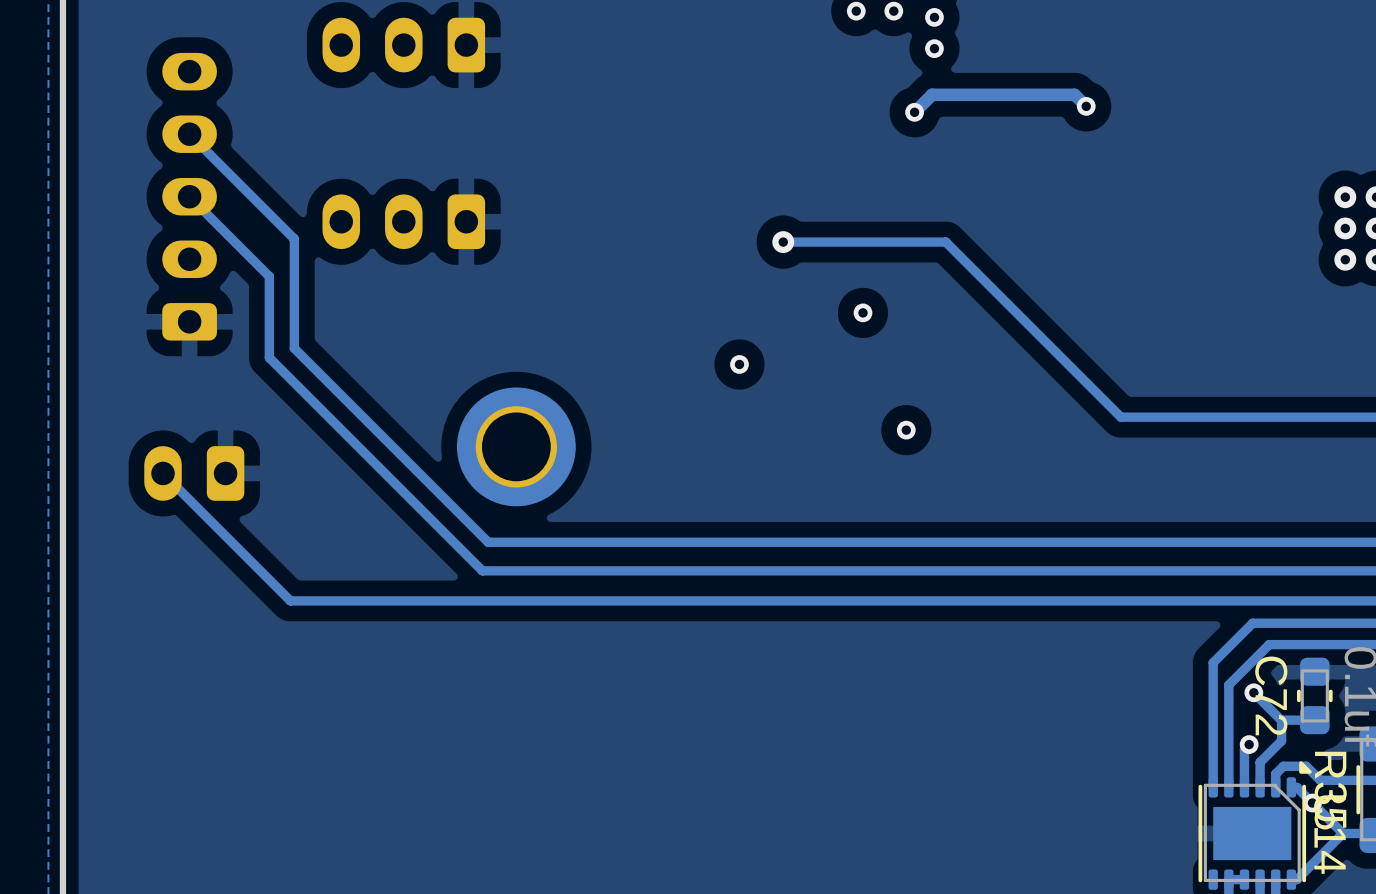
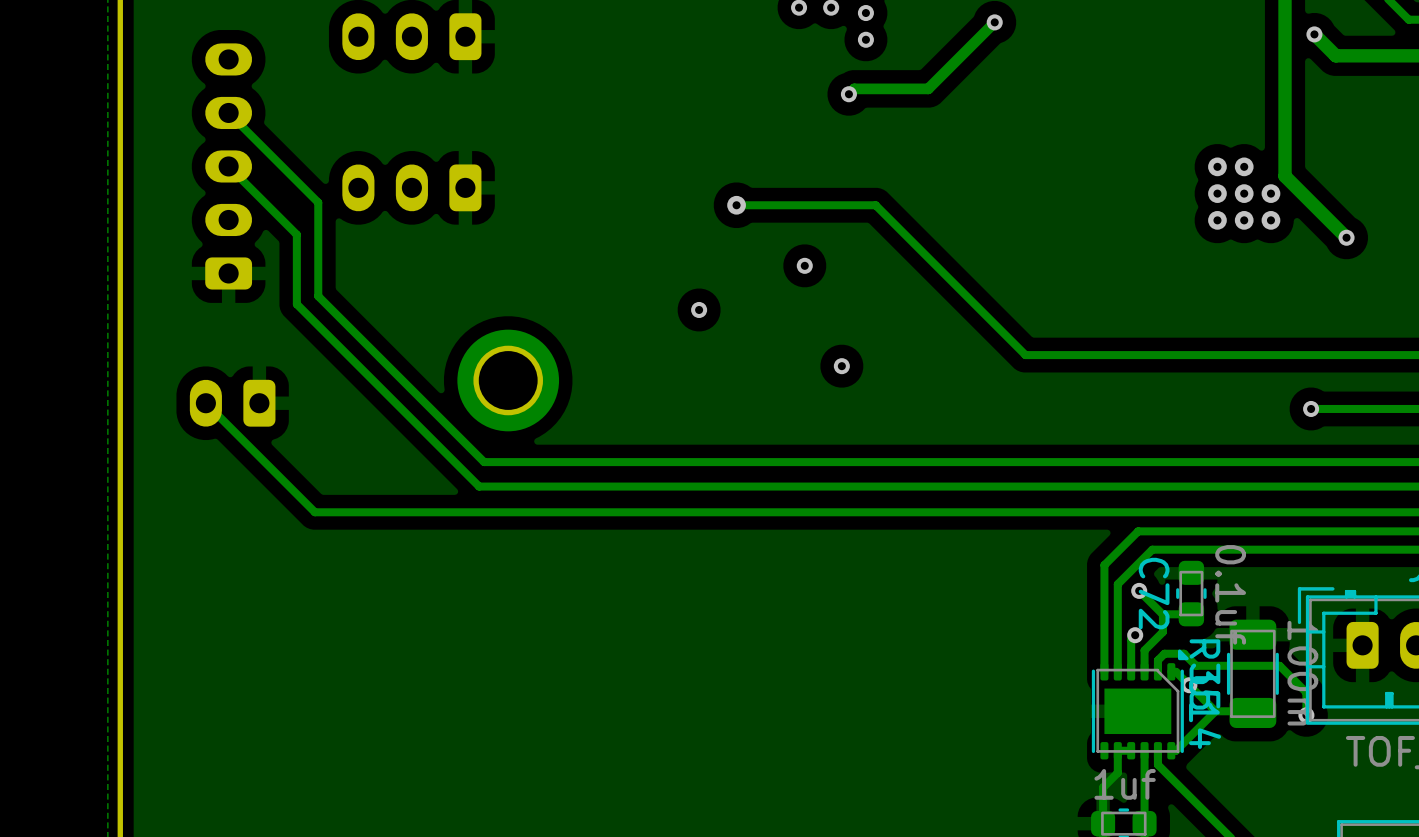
track: (920, 106) (932, 94) (1074, 94) (1086, 106) -> (854, 88) (928, 88) (994, 22)
via position: (1086, 106) -> (994, 22)

